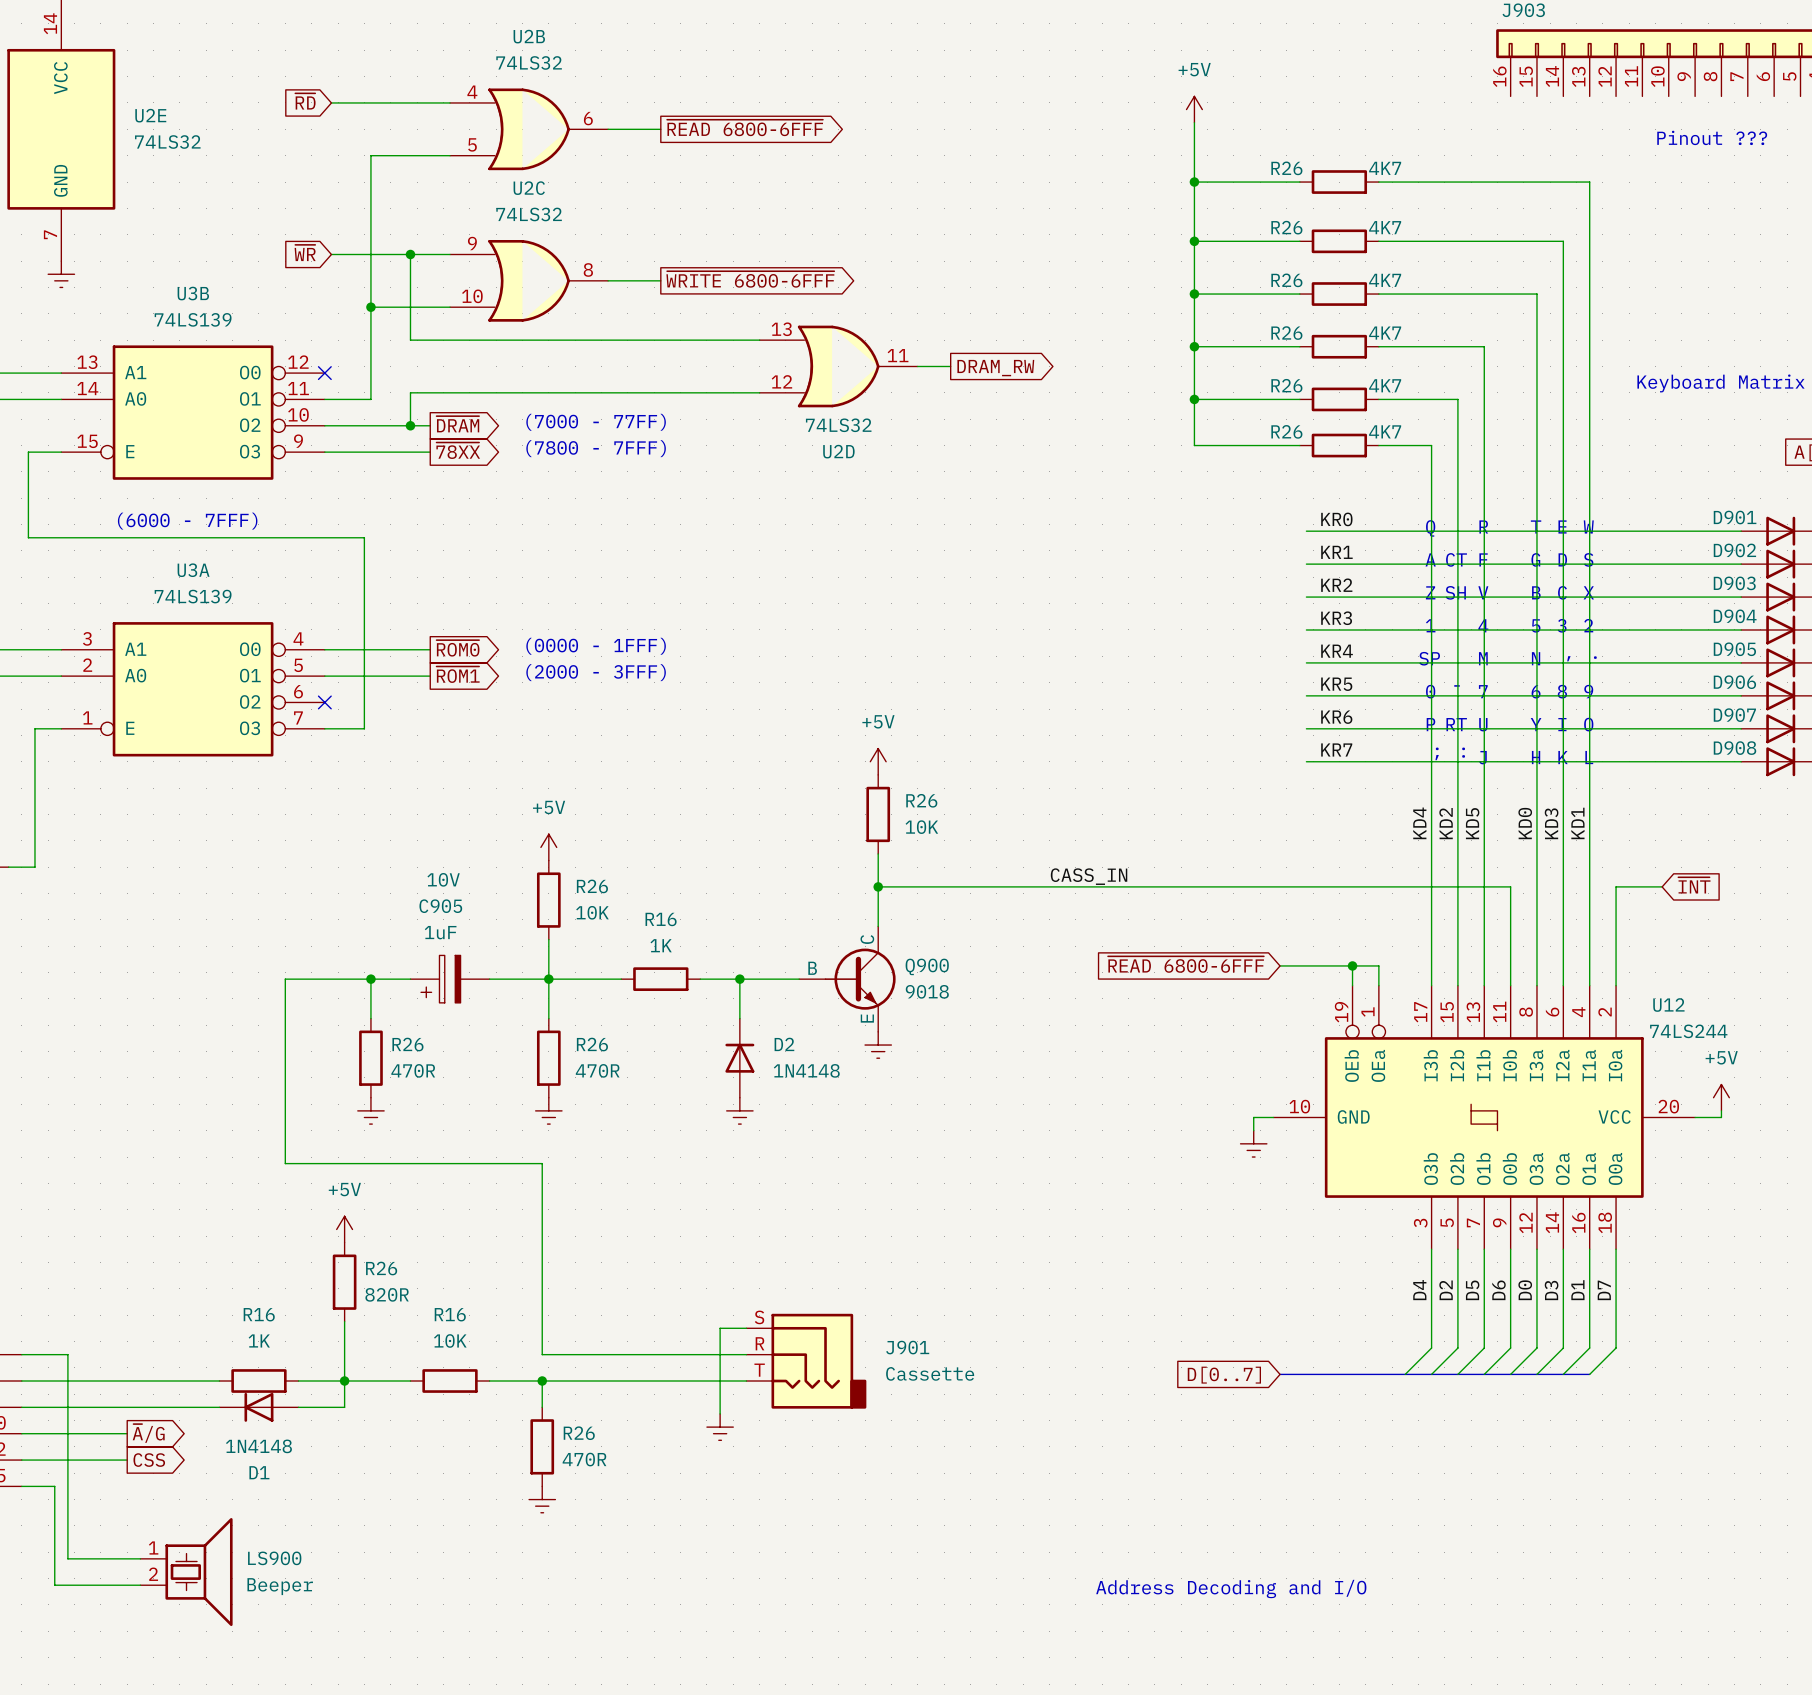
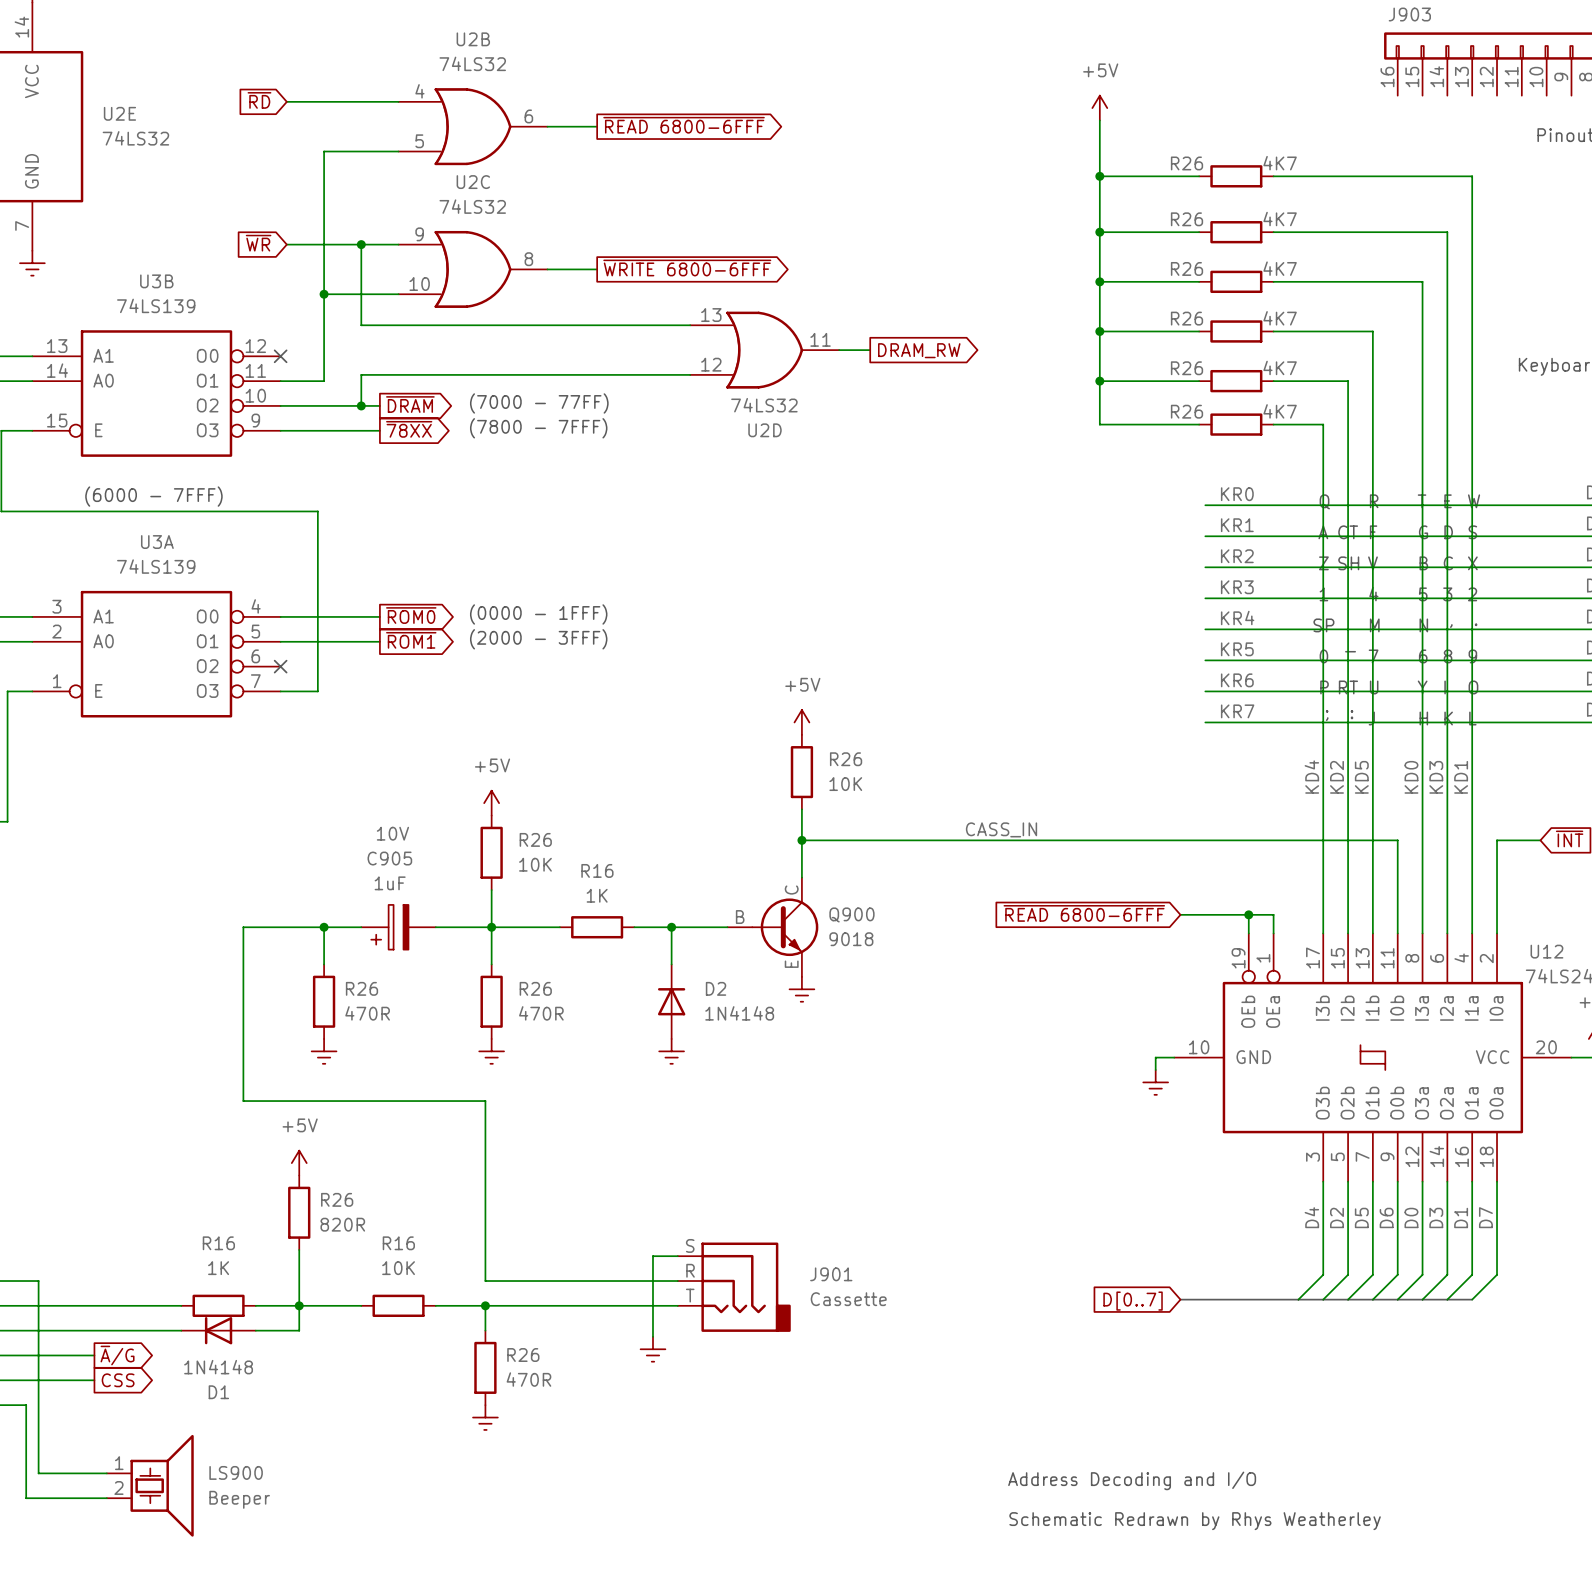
text position: Address Decoding and I/O (1231, 1589) -> Address Decoding and I/O (1132, 1480)
text: none -> Schematic Redrawn by Rhys Weatherley (1195, 1521)

